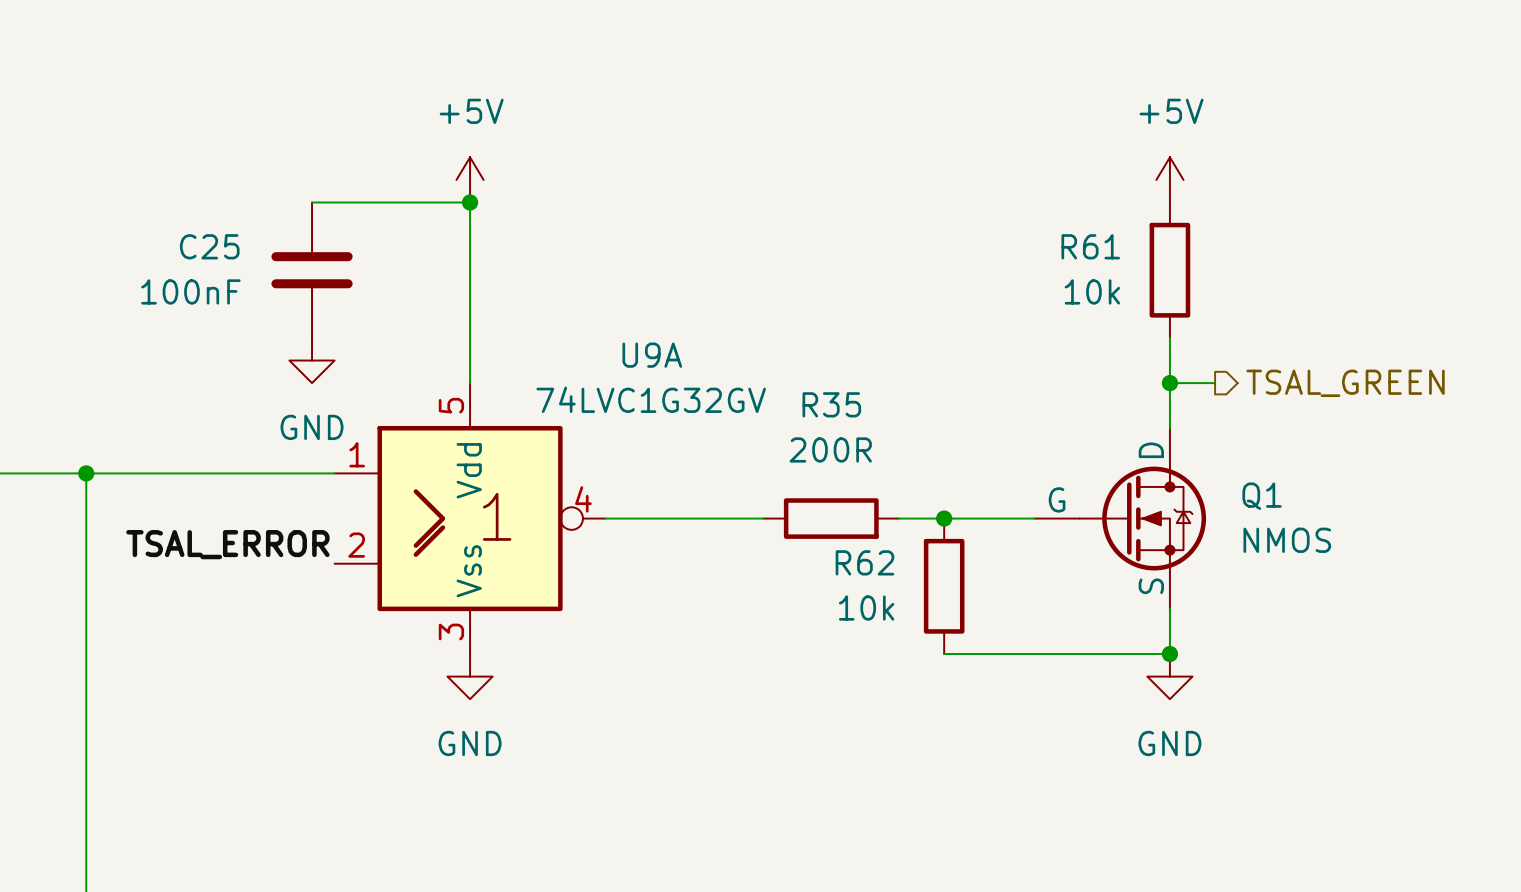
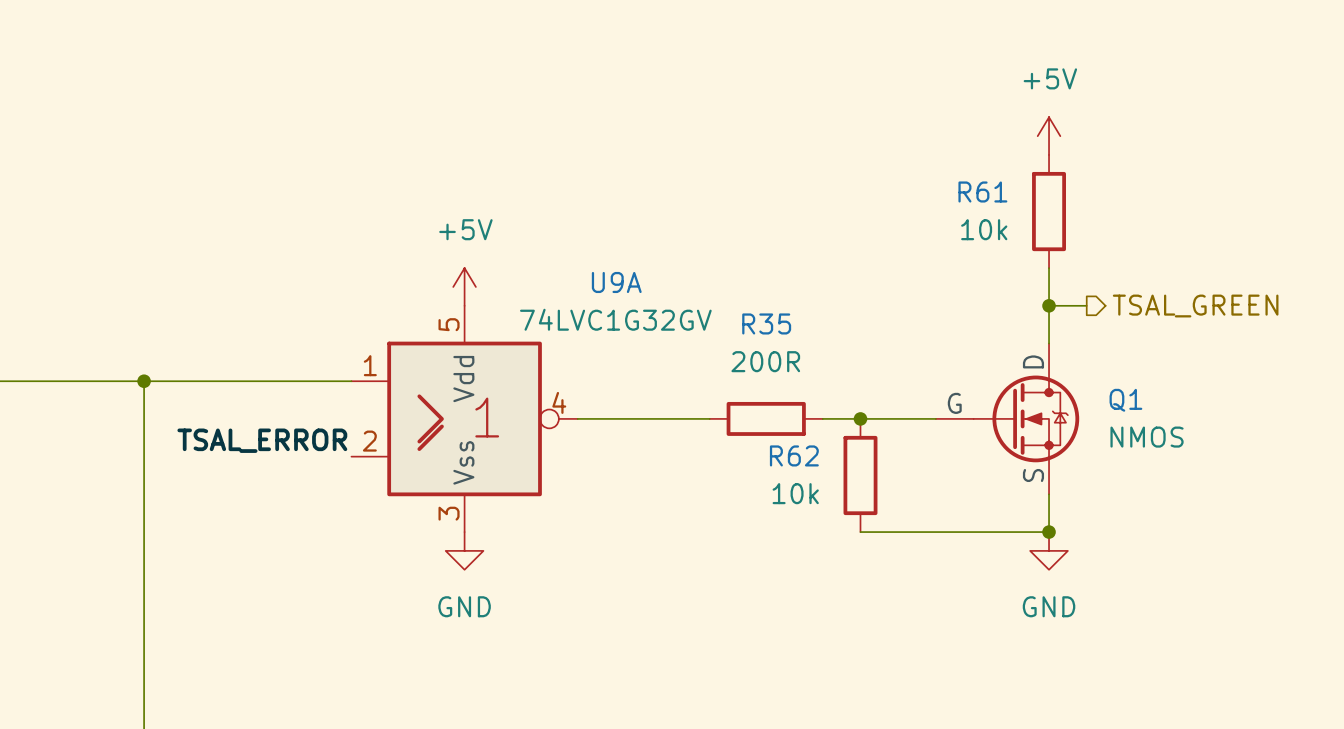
power symbol position: +5V (470, 179) -> +5V (464, 286)
wire: (312, 202) (470, 202) (470, 383) -> none
junction: (470, 202) -> none
C25: 100nF (312, 270) -> none
power symbol: GND (312, 360) -> none

